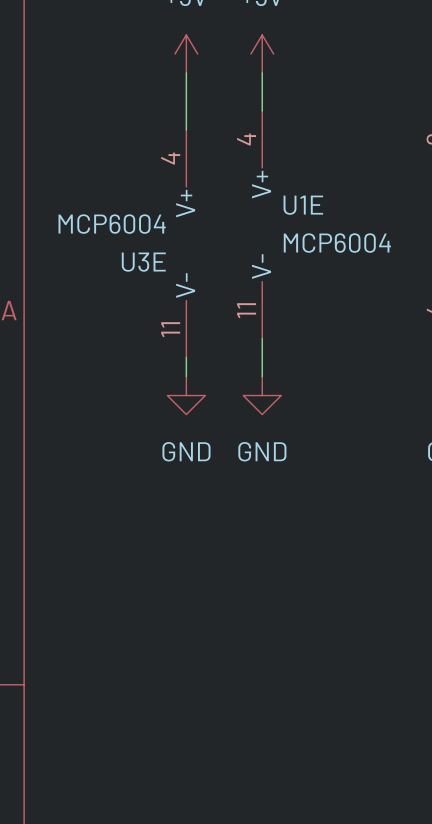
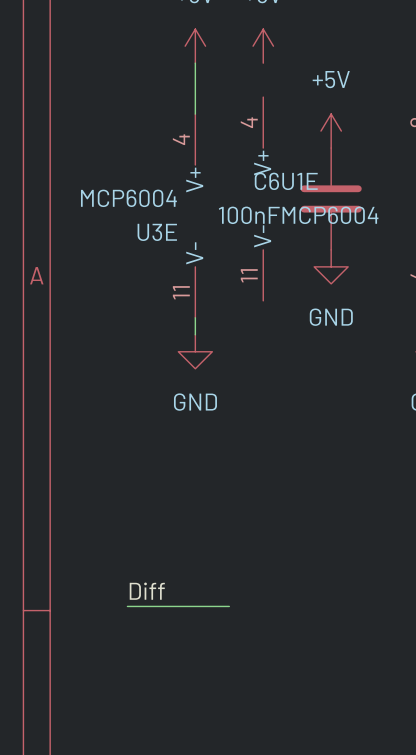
wire: (262, 72) (262, 110) -> none
power symbol: none -> +5V (331, 131)
C6: none -> 100nF (331, 198)
wire: (262, 338) (262, 376) -> none
power symbol position: GND (262, 395) -> GND (331, 266)
label: none -> Diff (147, 591)
wire: none -> (127, 606) (229, 606)

